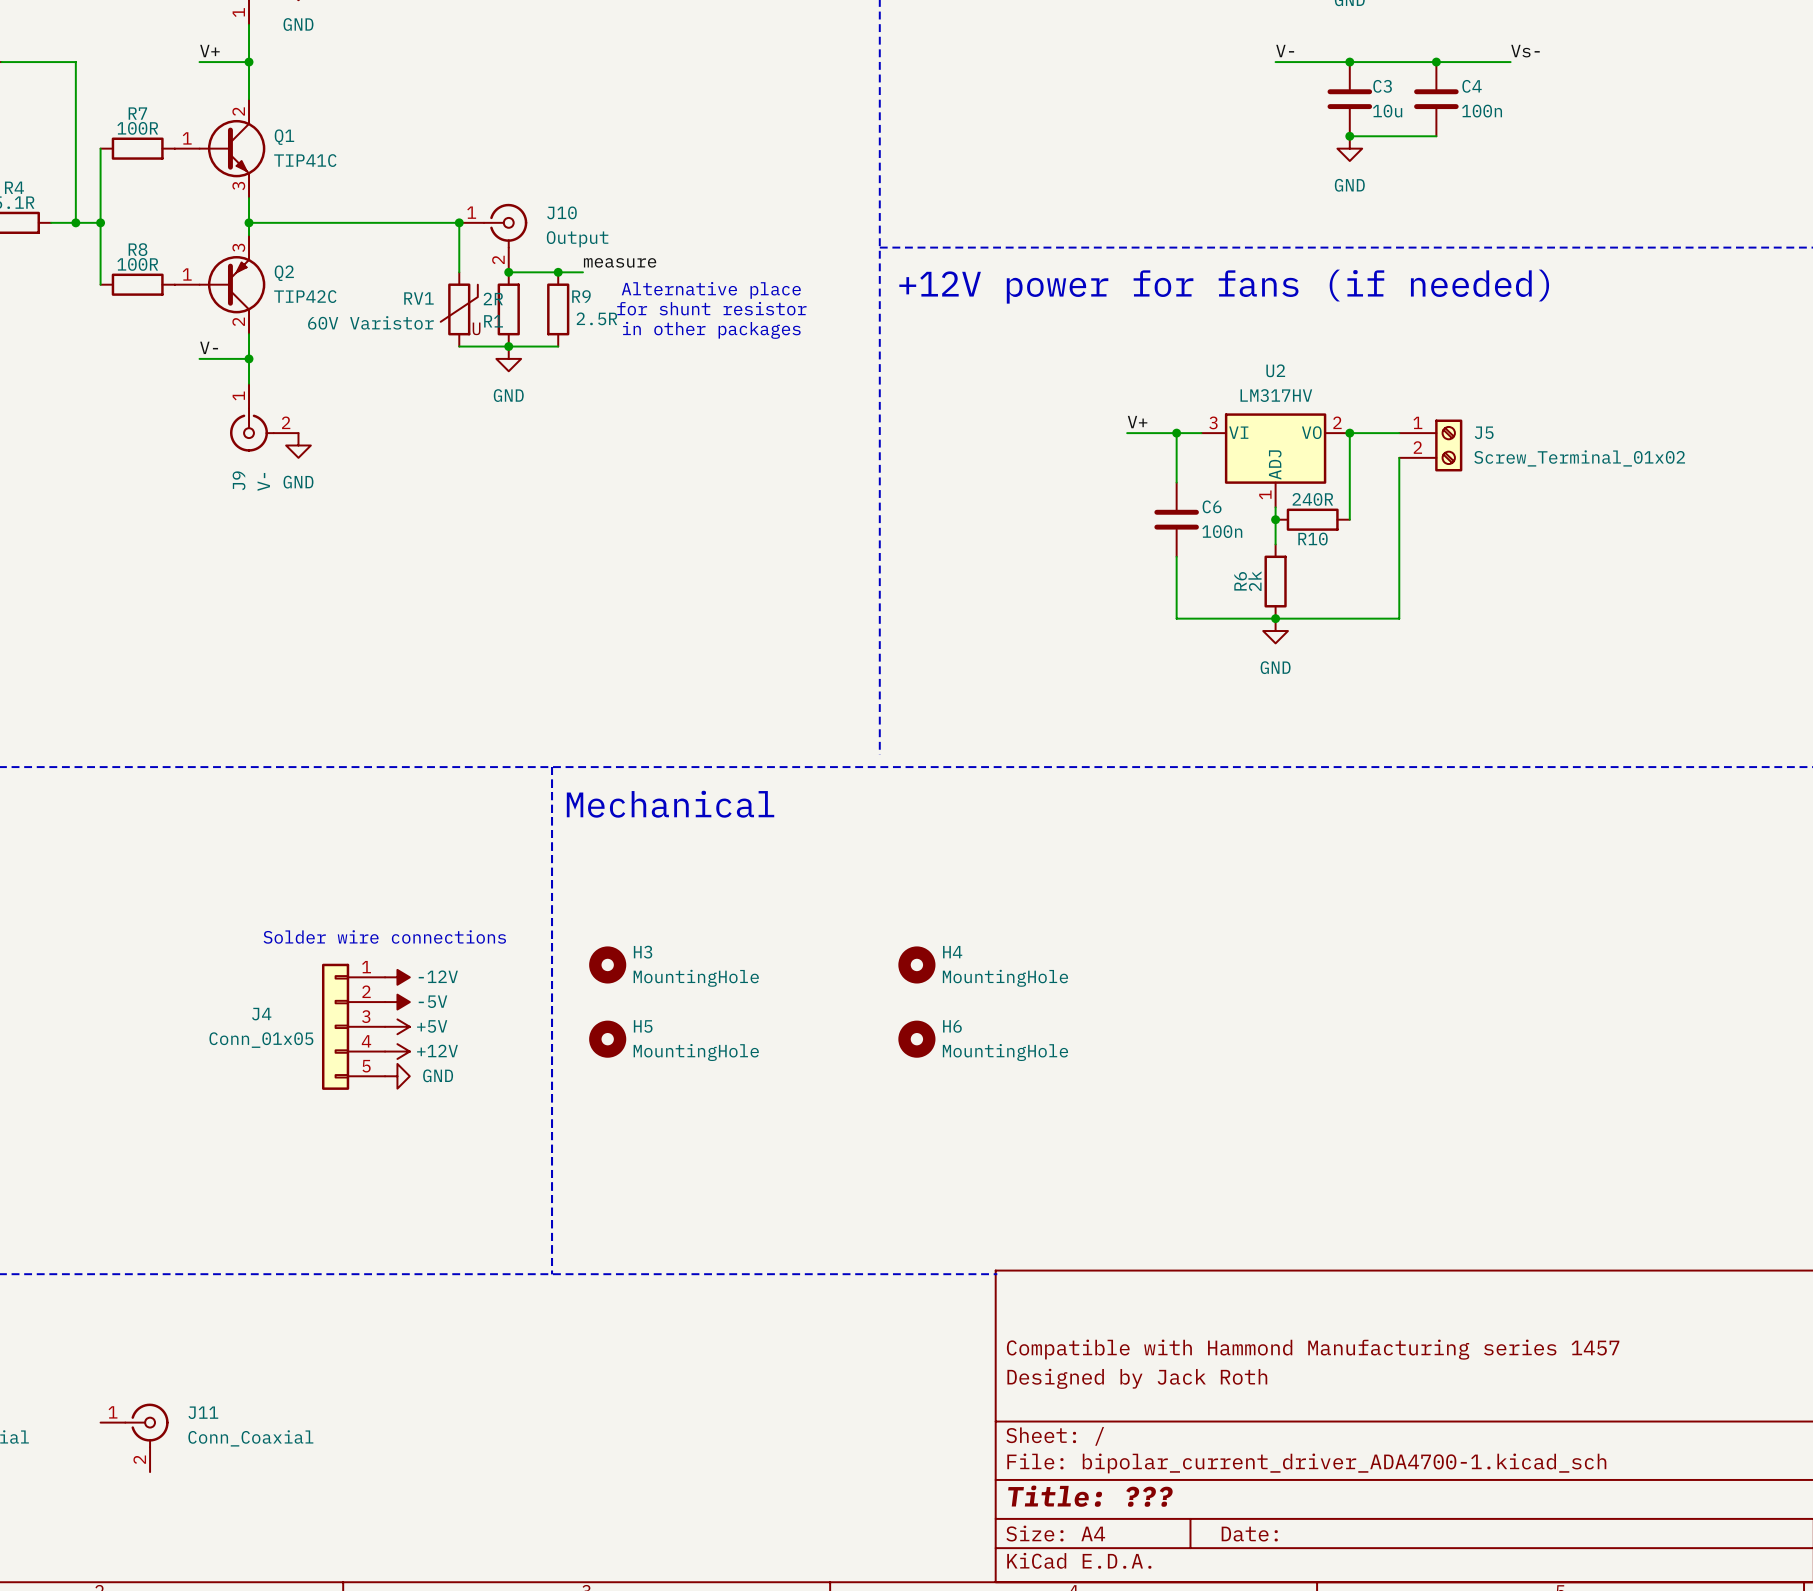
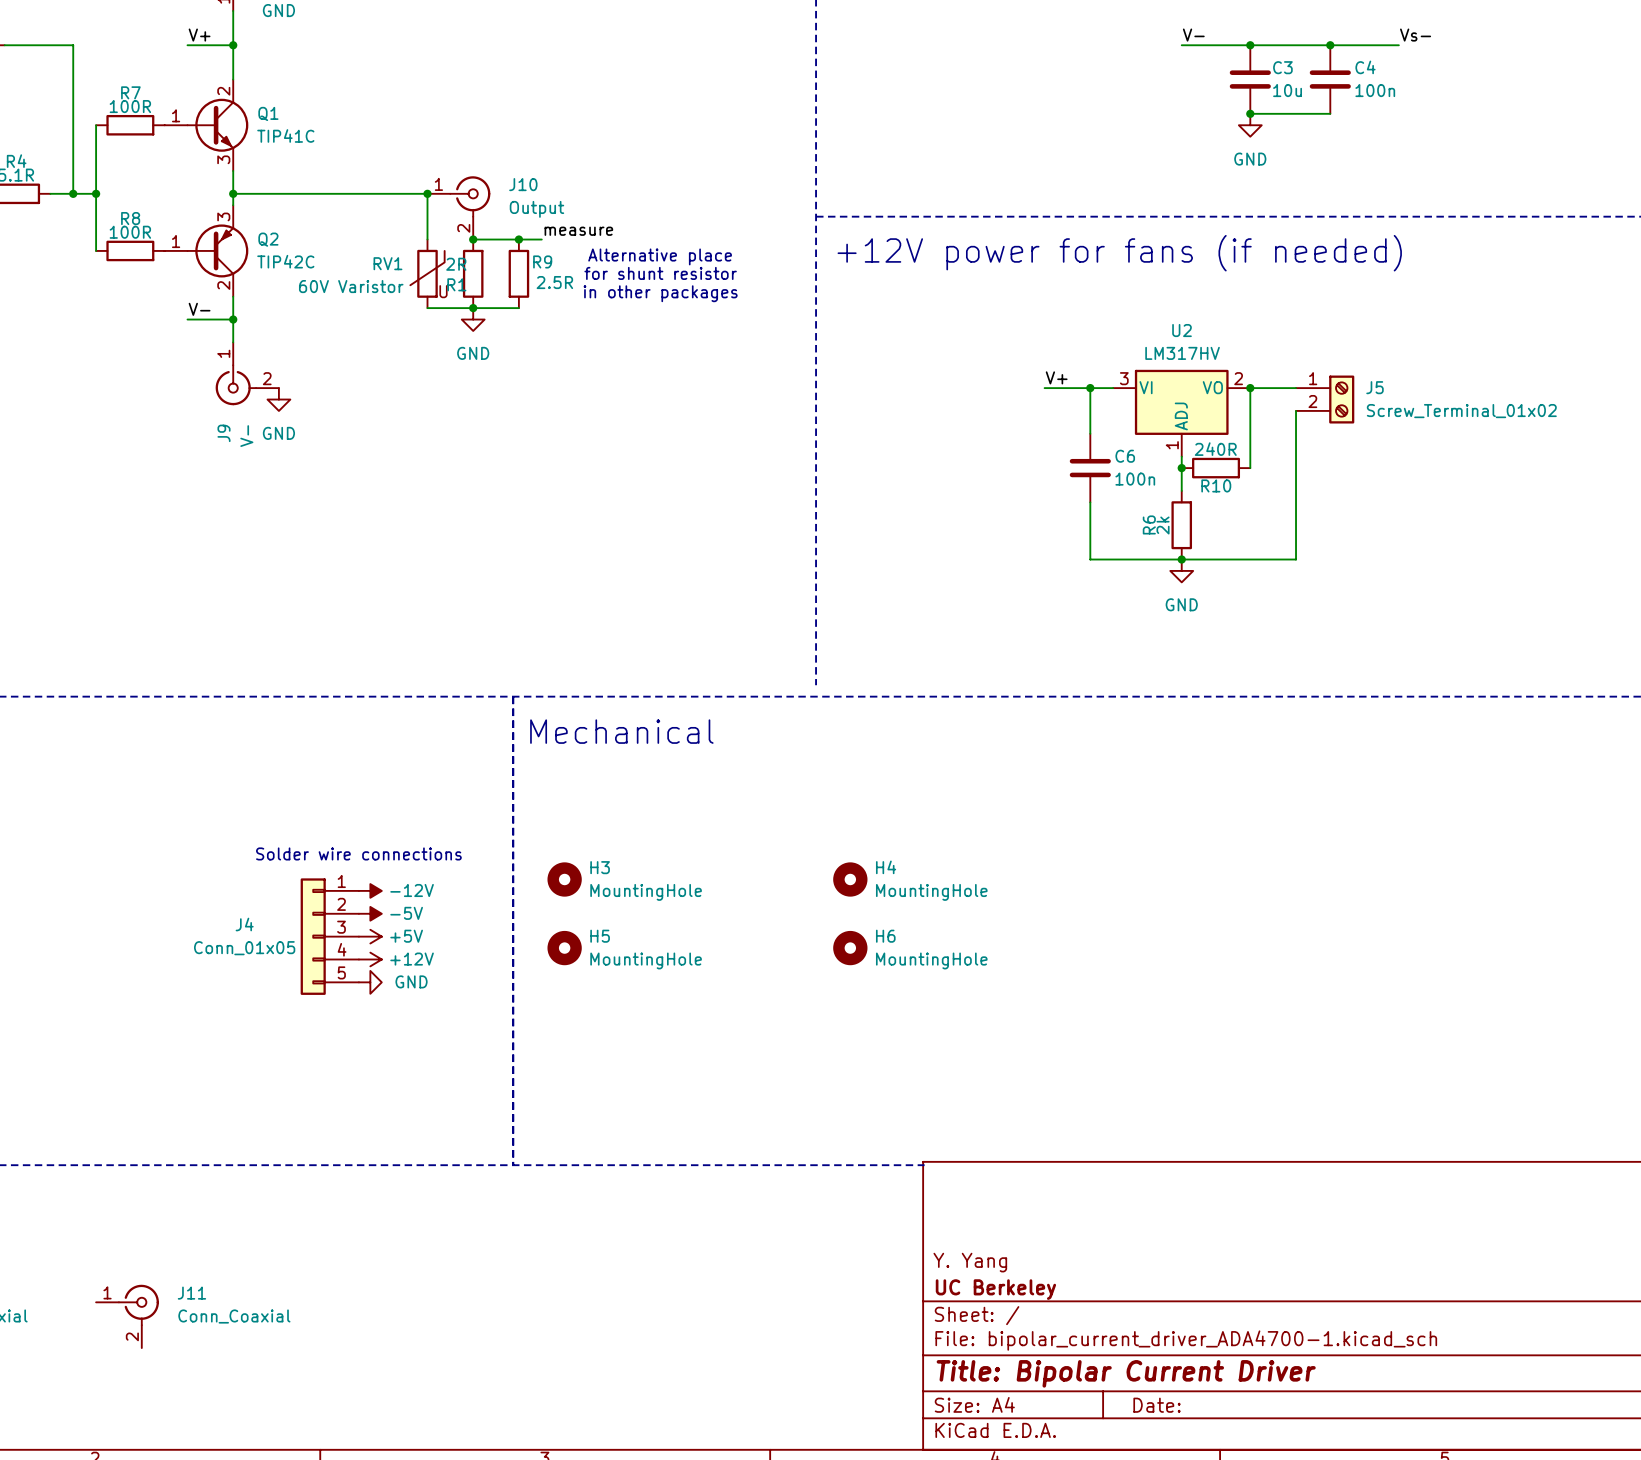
title block: Compatible with Hammond Manufacturing series 1457 (1313, 1349) -> none
title block: Designed by Jack Roth (1137, 1378) -> Y. Yang (970, 1262)
title block: none -> UC Berkeley (995, 1289)
title block: Title: ??? (1090, 1496) -> Title: Bipolar Current Driver (1126, 1373)

